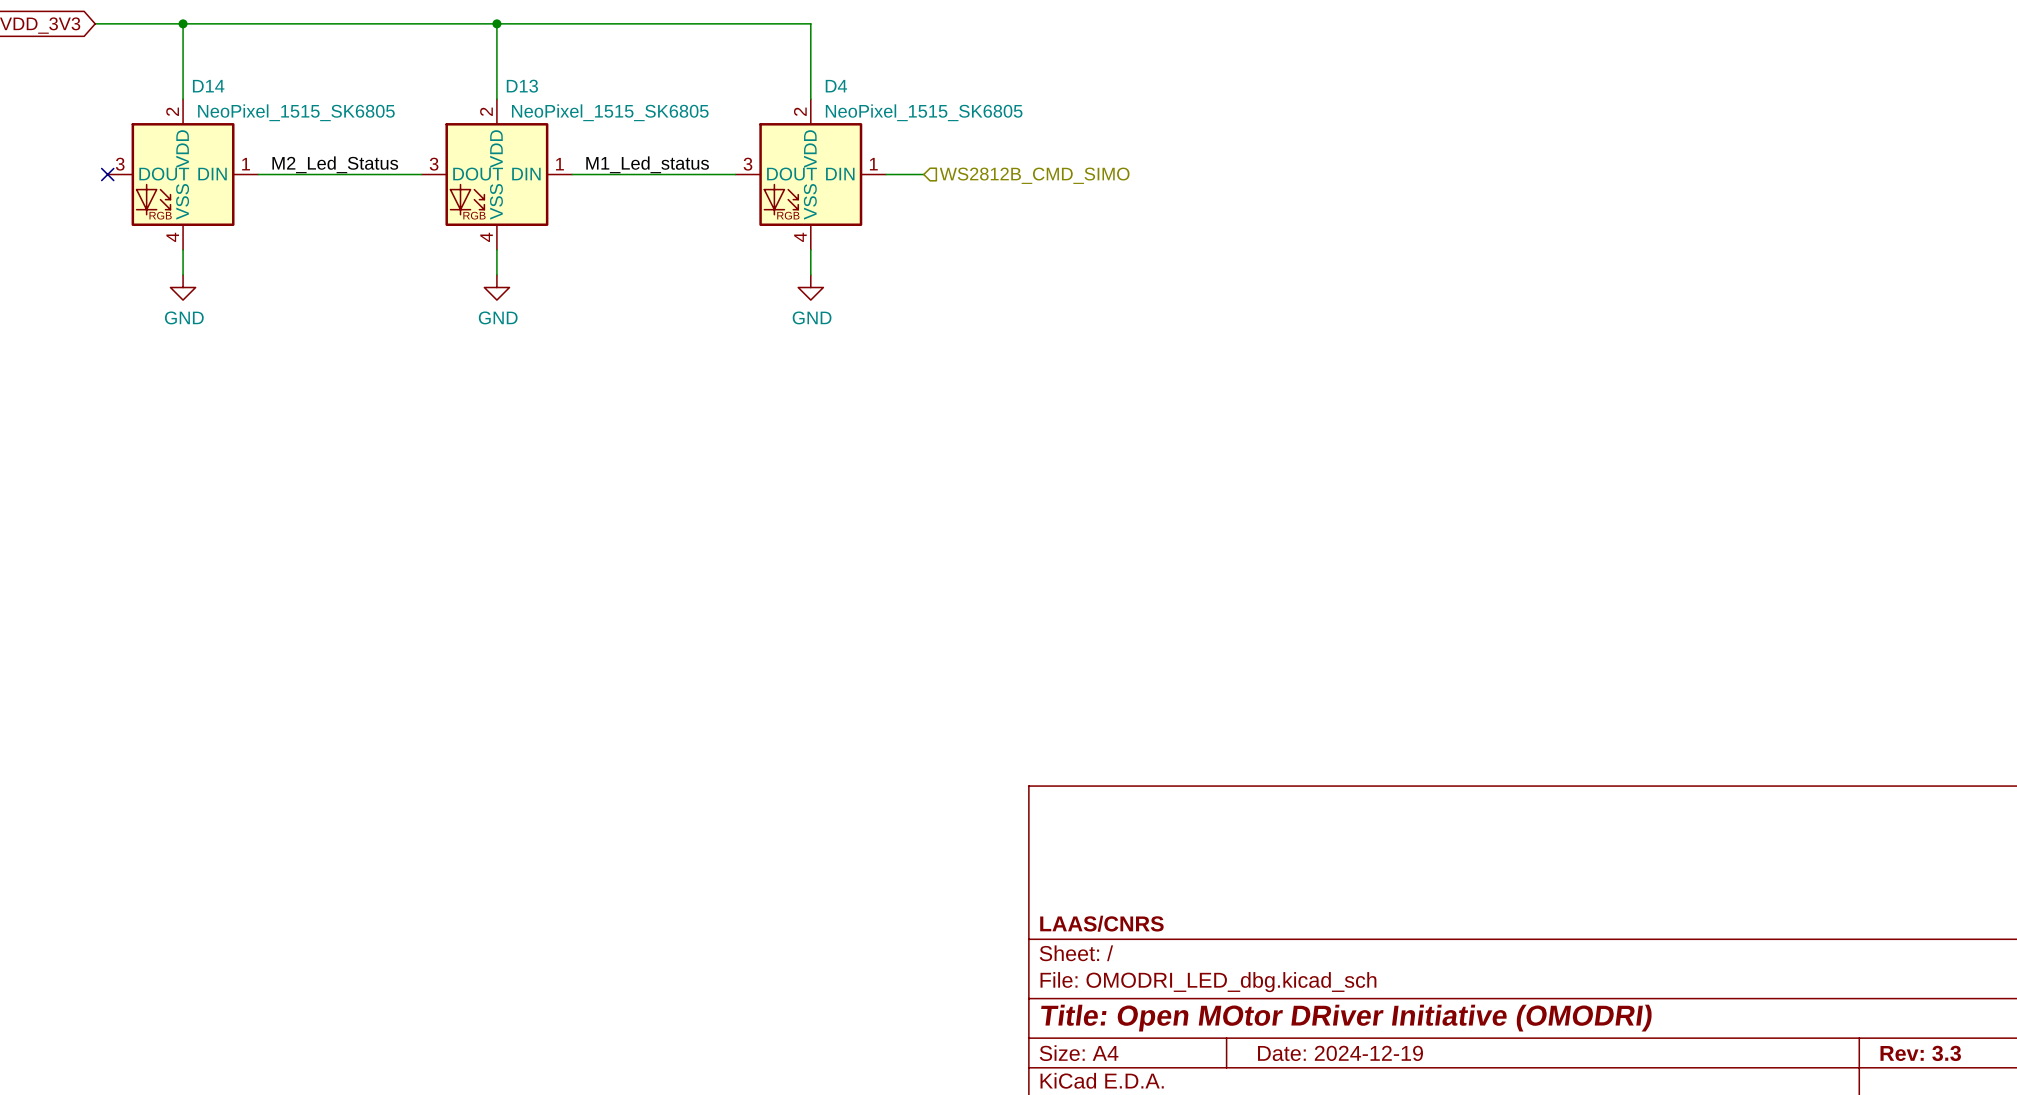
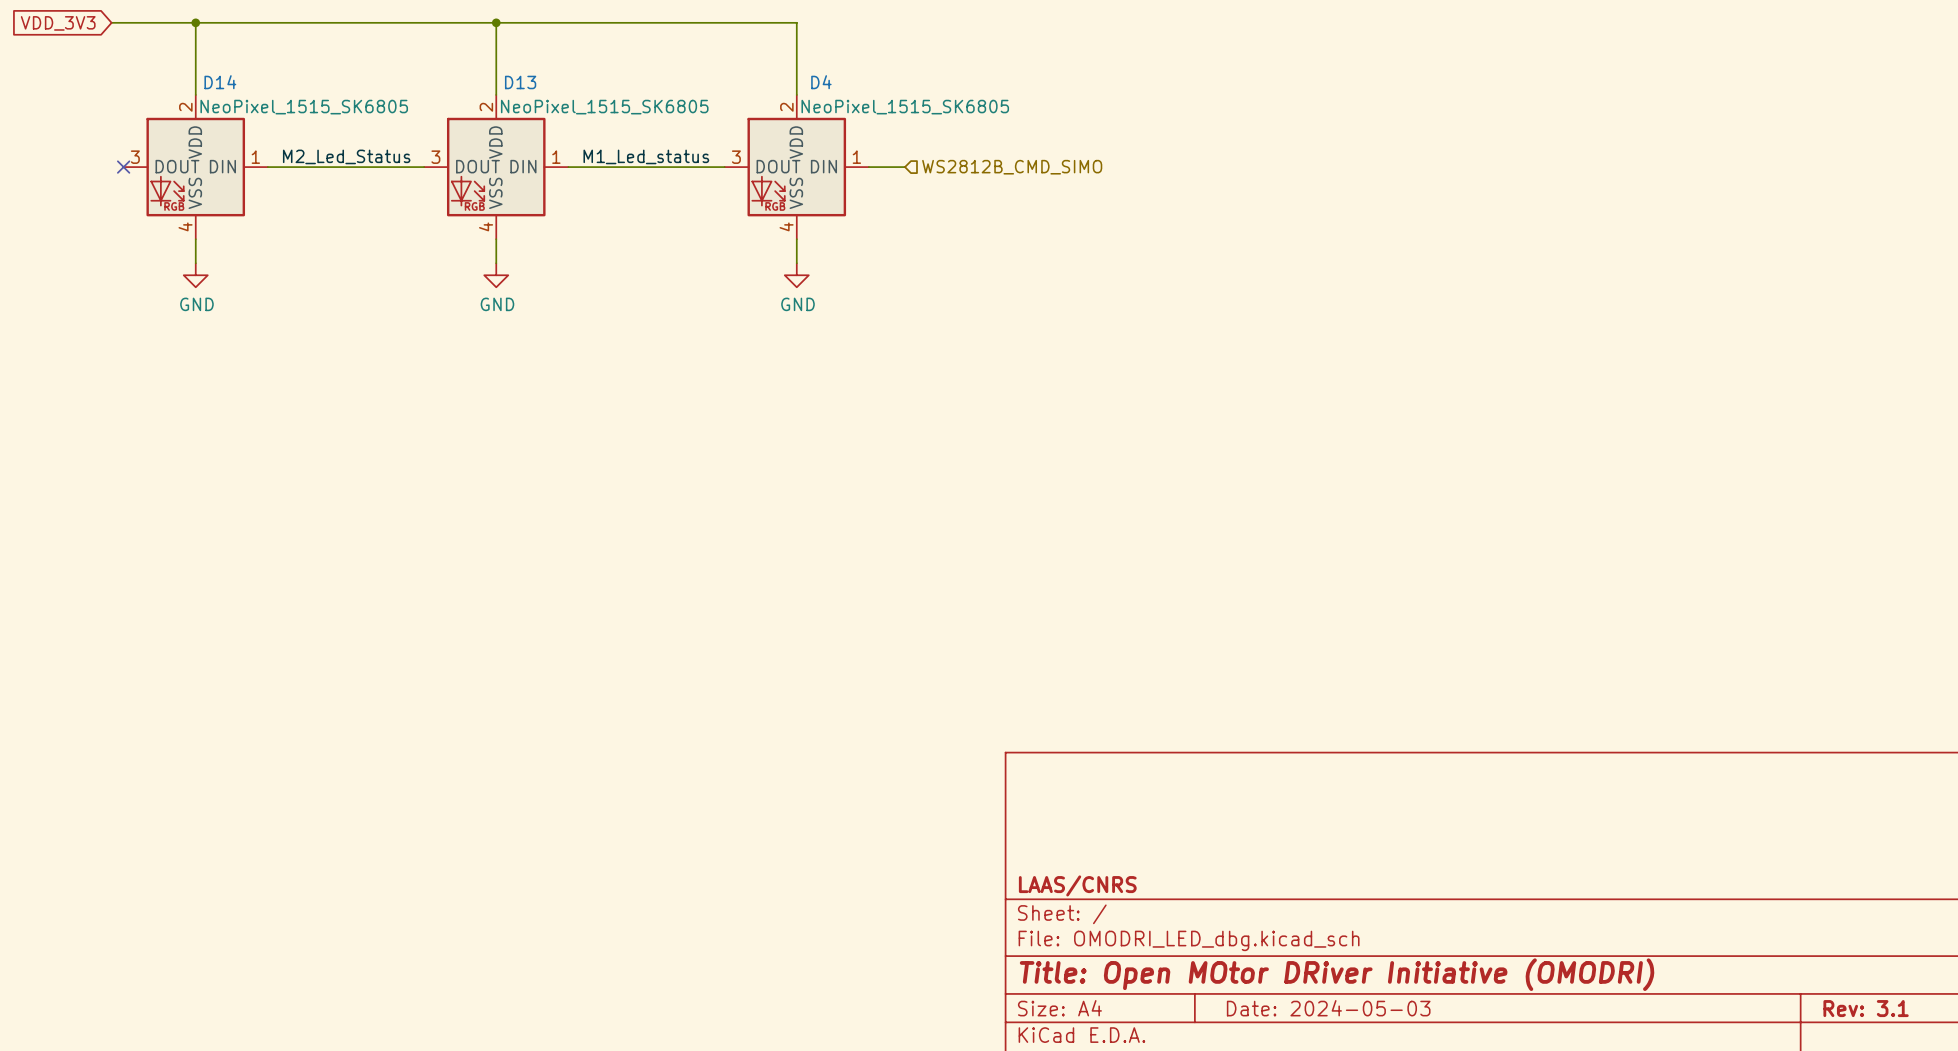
title block: Date: 2024-12-19 (1340, 1053) -> Date: 2024-05-03 (1328, 1008)
title block: Rev: 3.3 (1920, 1053) -> Rev: 3.1 (1866, 1008)

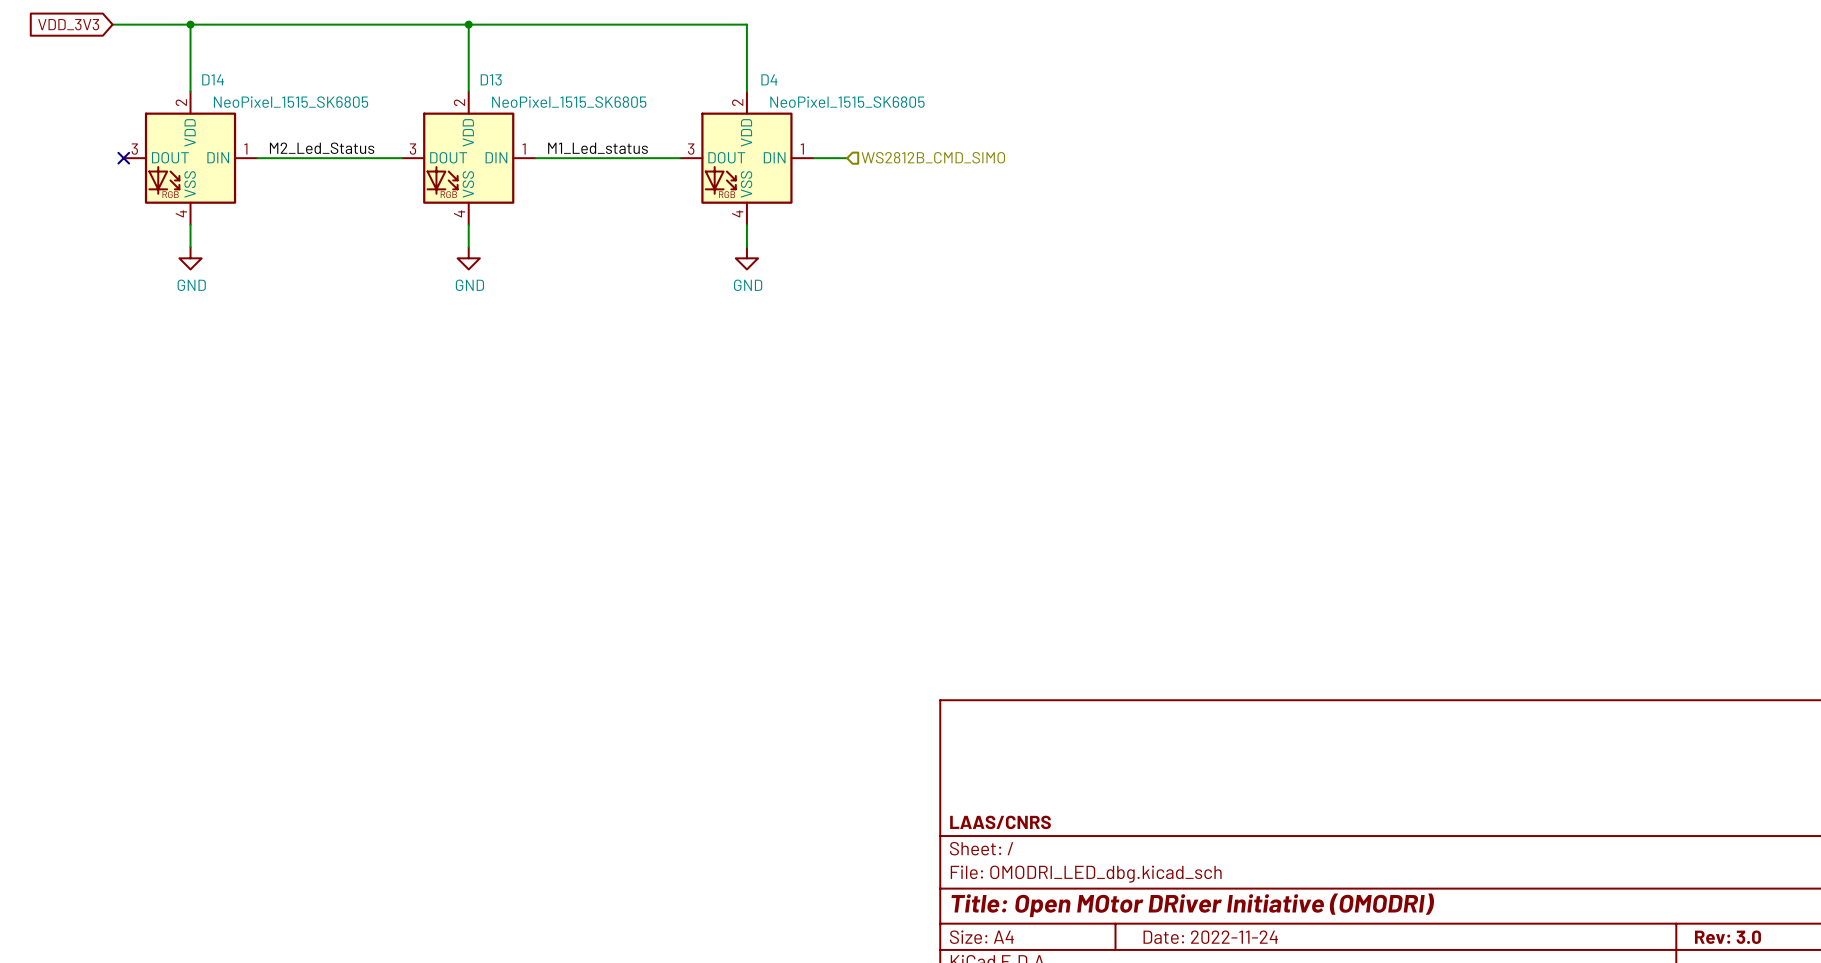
title block: Date: 2024-05-03 (1328, 1008) -> Date: 2022-11-24 (1210, 937)
title block: Rev: 3.1 (1866, 1008) -> Rev: 3.0 (1727, 937)

